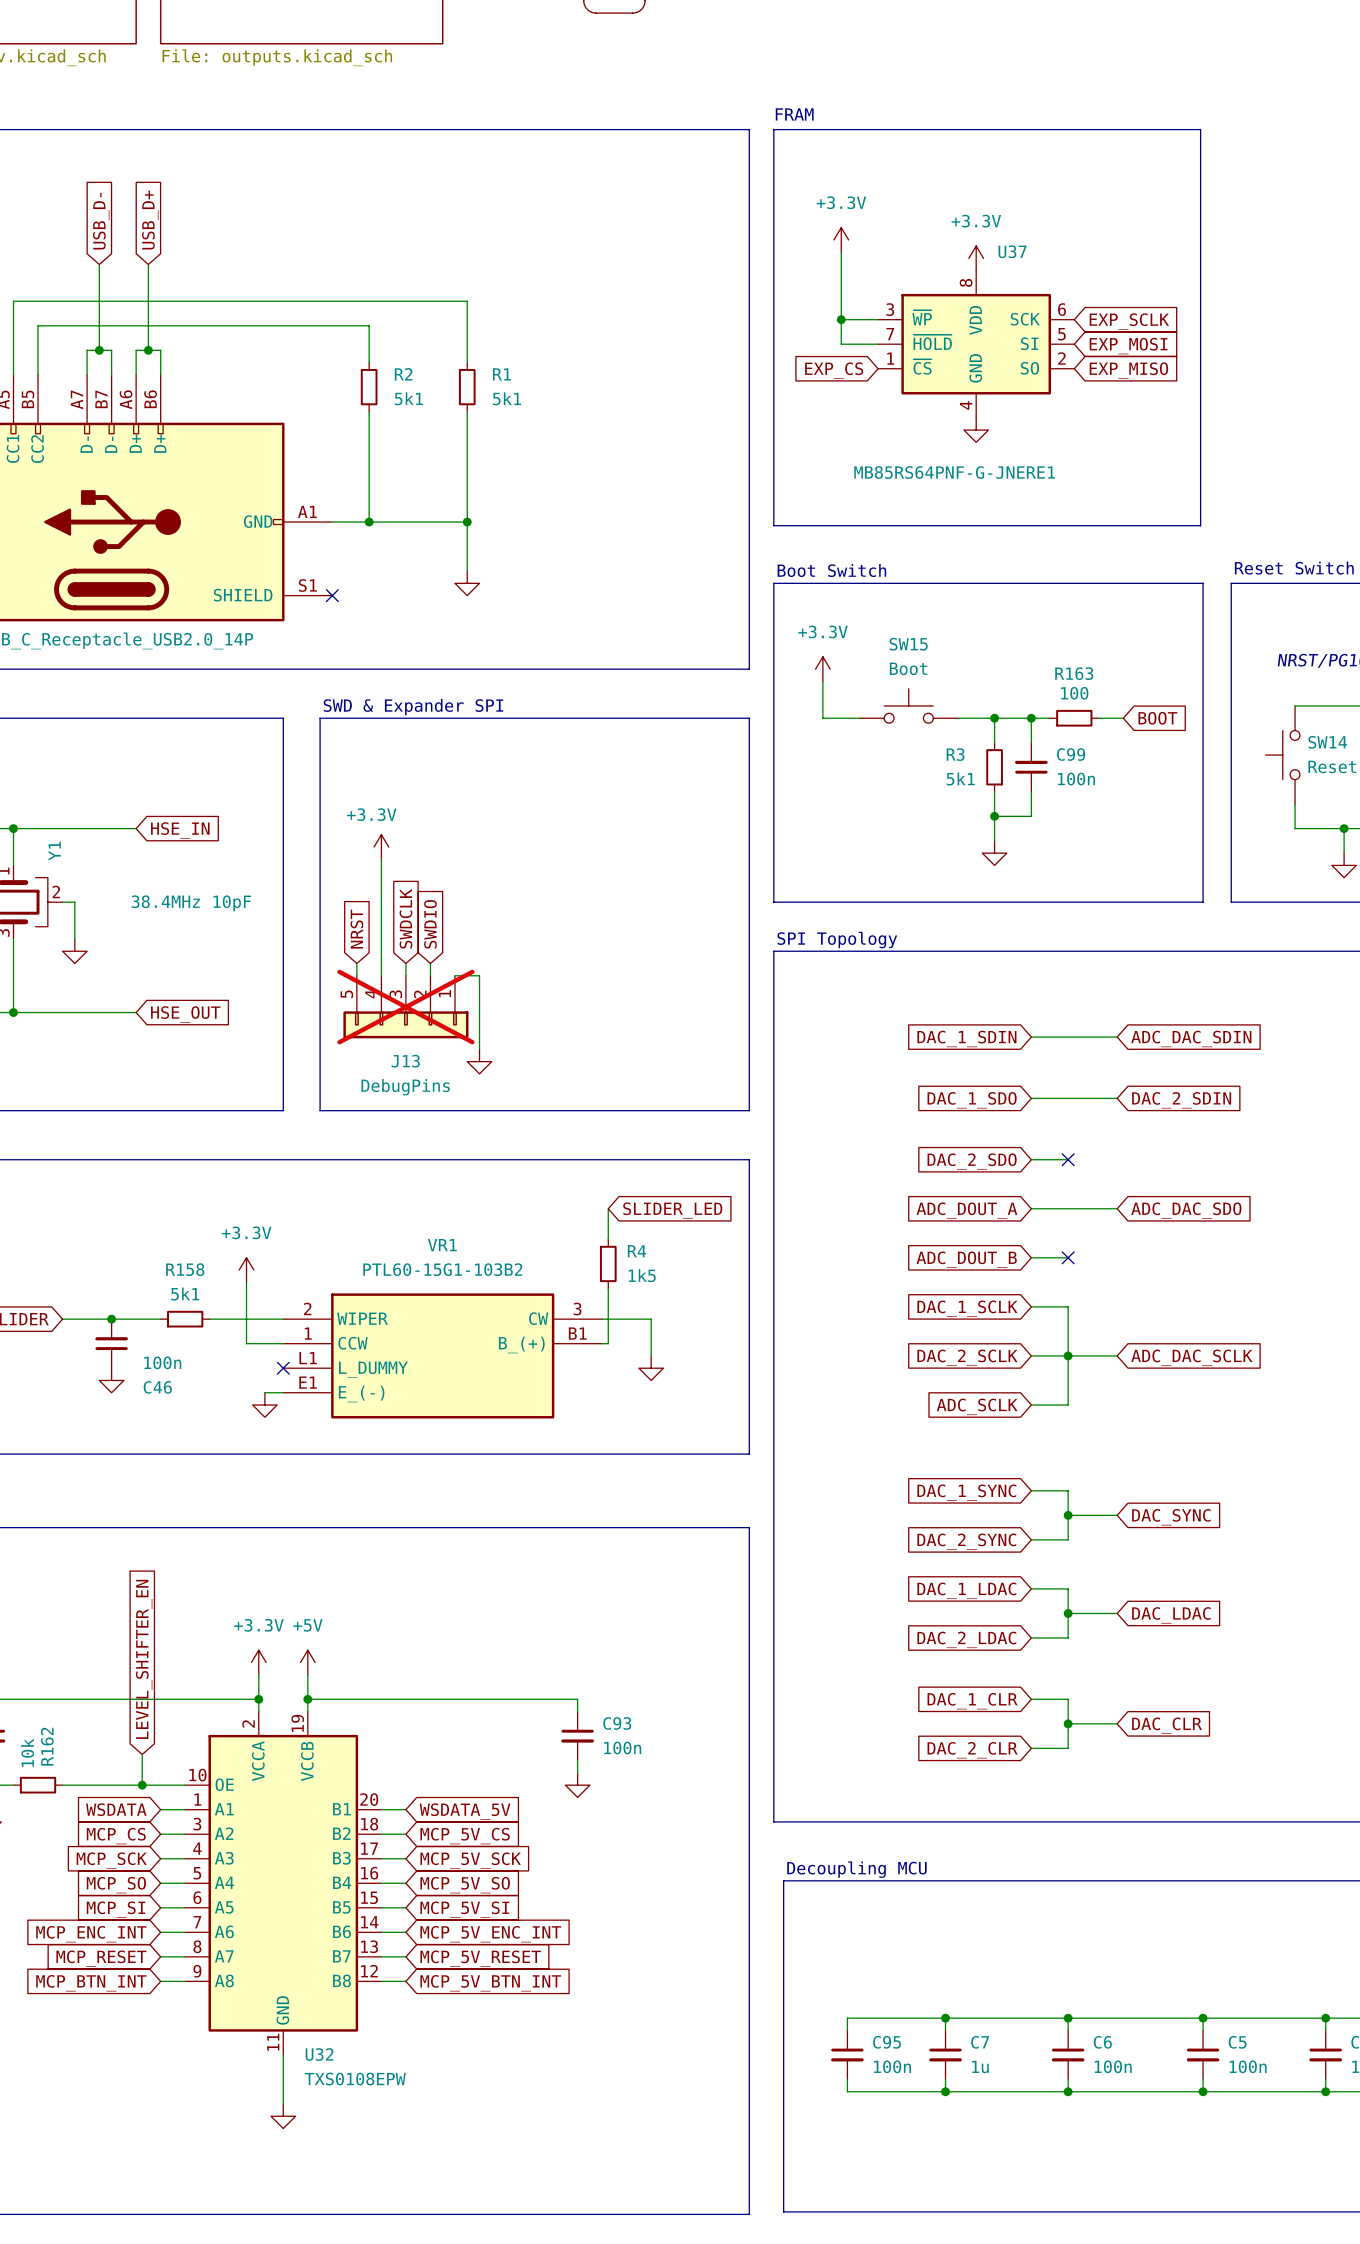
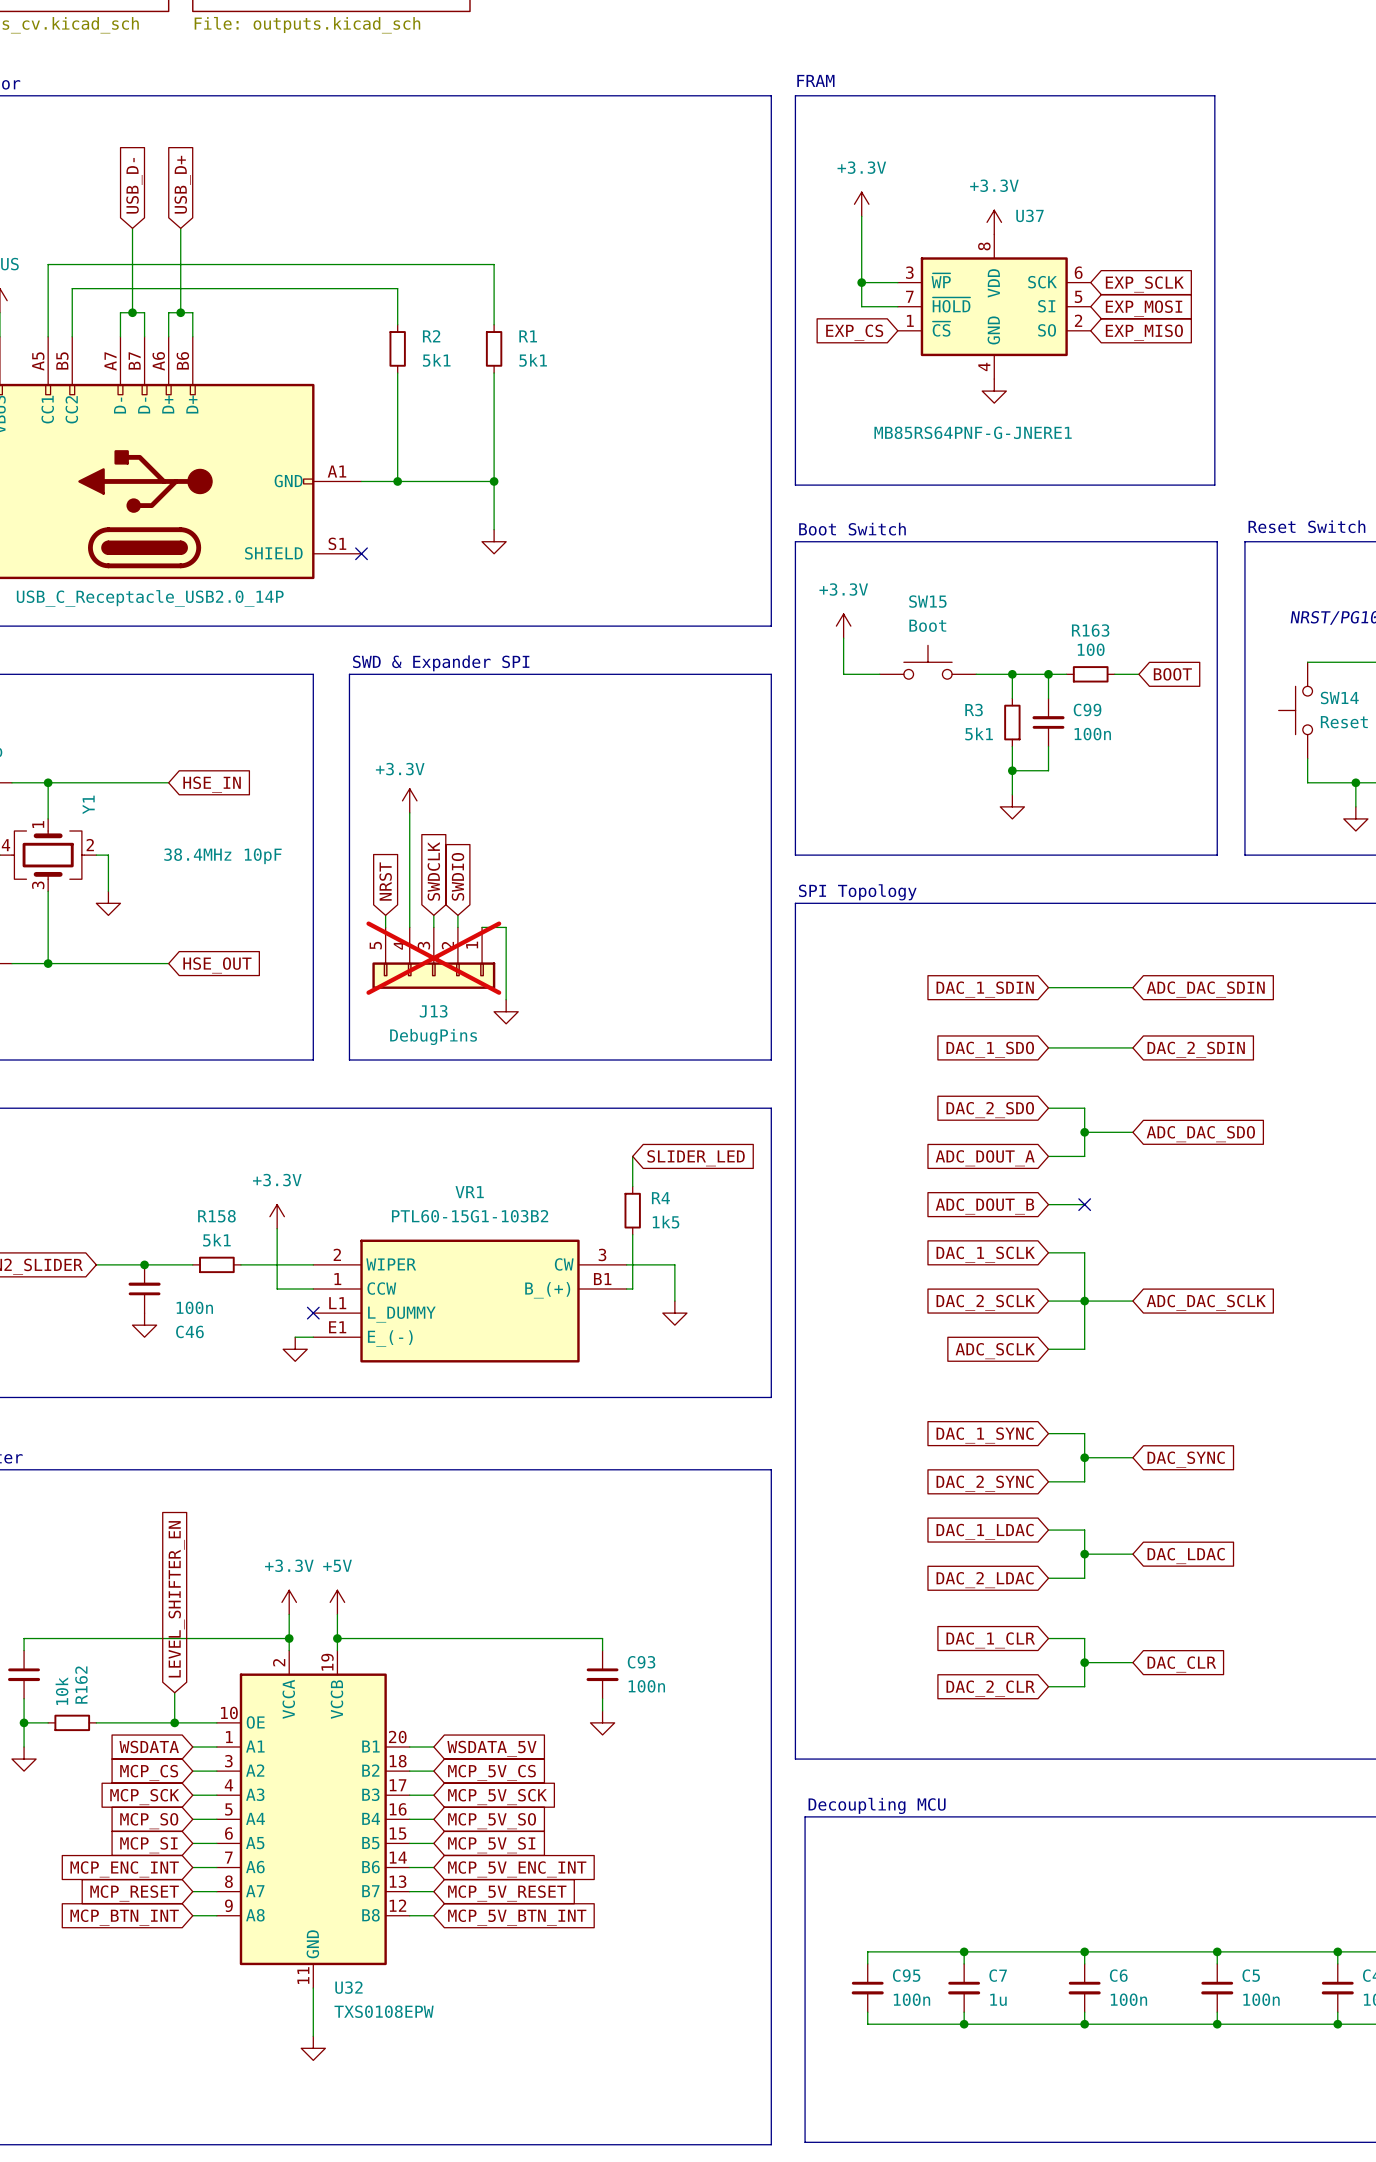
no-connect mark: (1068, 1159) -> none
wire: none -> (1084, 1132) (1132, 1132)
junction: none -> (1084, 1132)
wire: (1068, 1208) (1117, 1208) -> (1084, 1156) (1084, 1108)
global label position: ADC_DAC_SDO (1186, 1210) -> ADC_DAC_SDO (1200, 1134)

